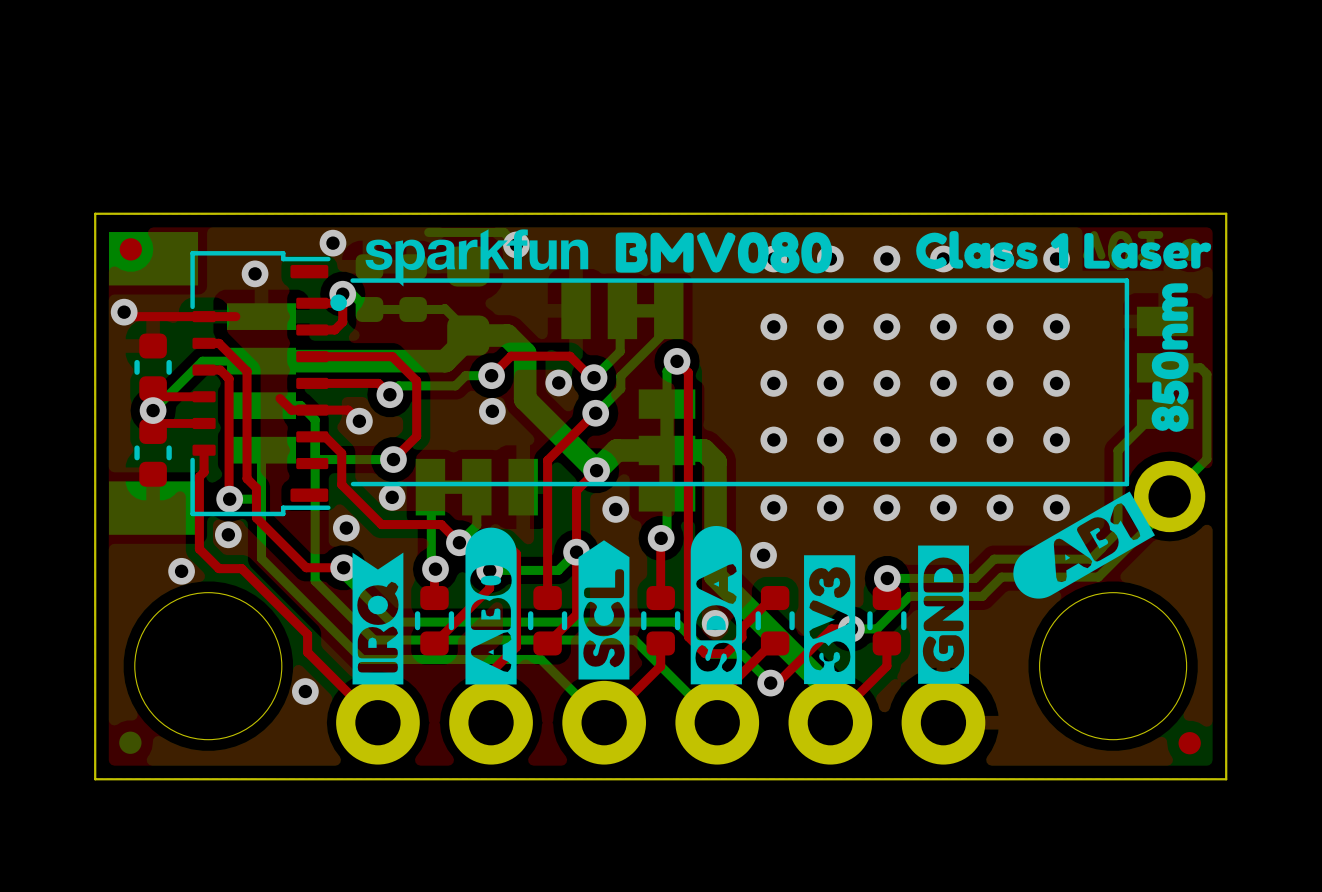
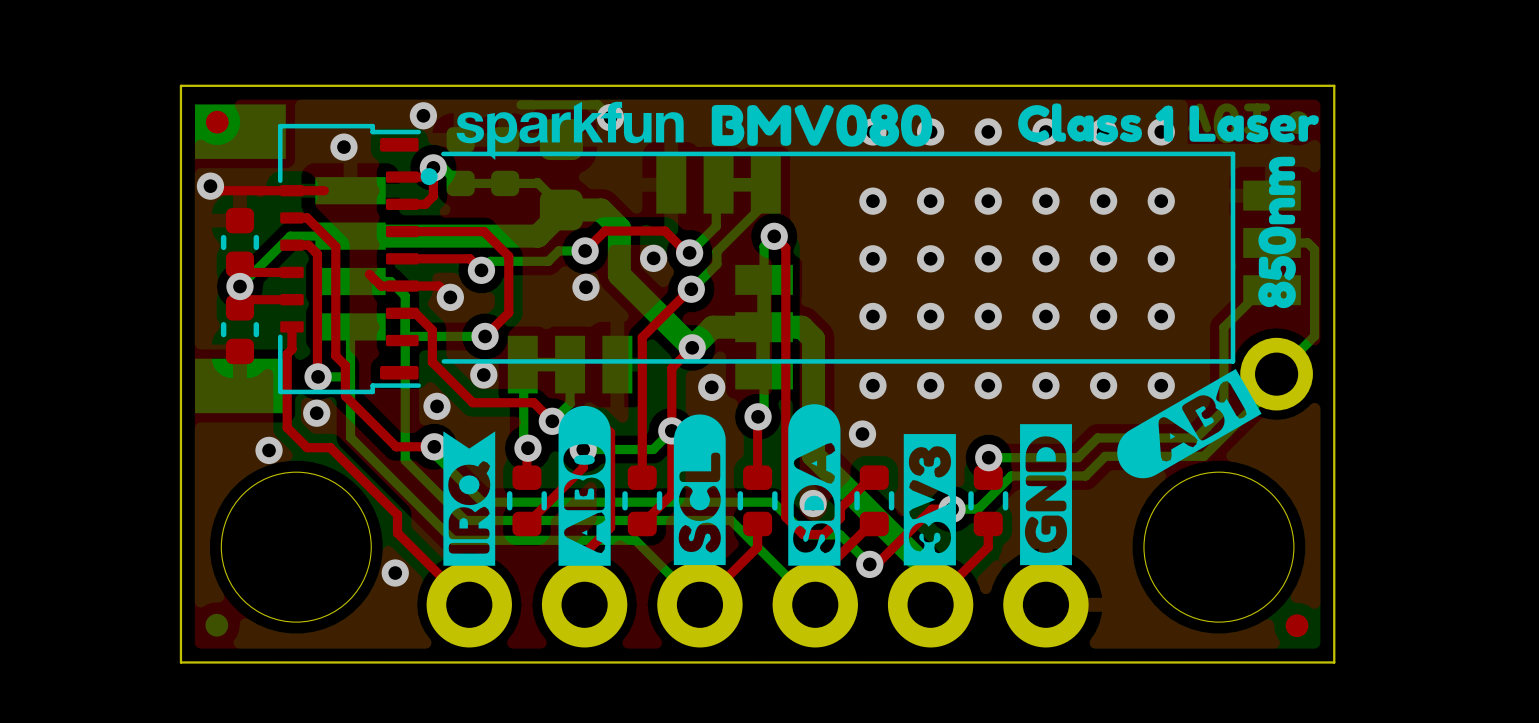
drawing shape: [578, 540, 630, 680] -> [673, 414, 726, 566]

